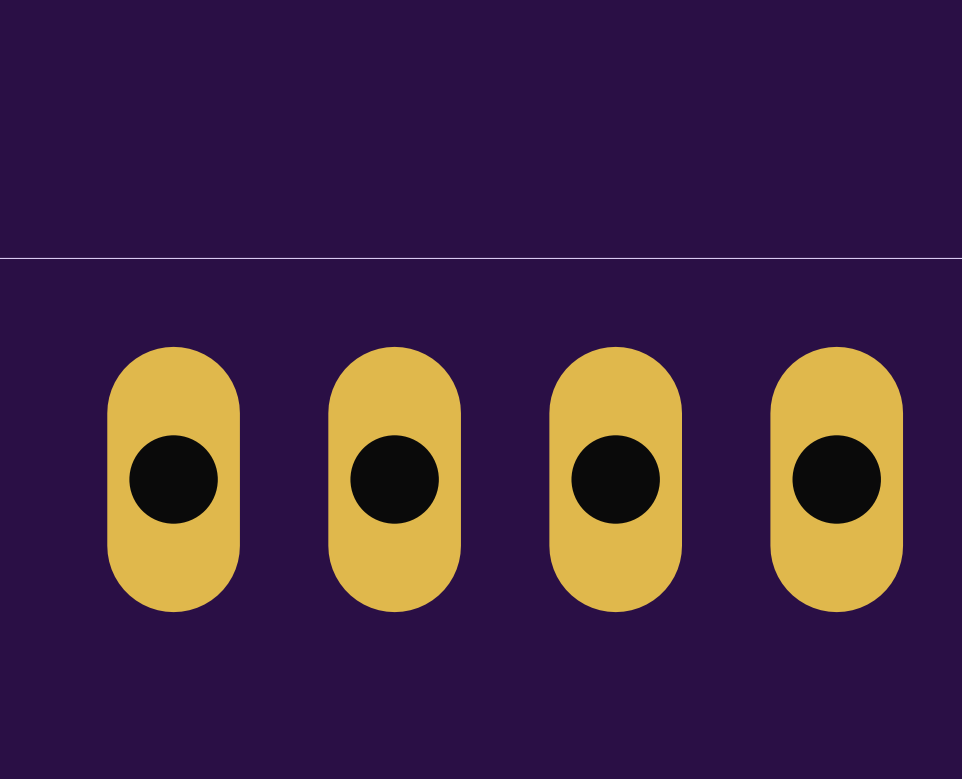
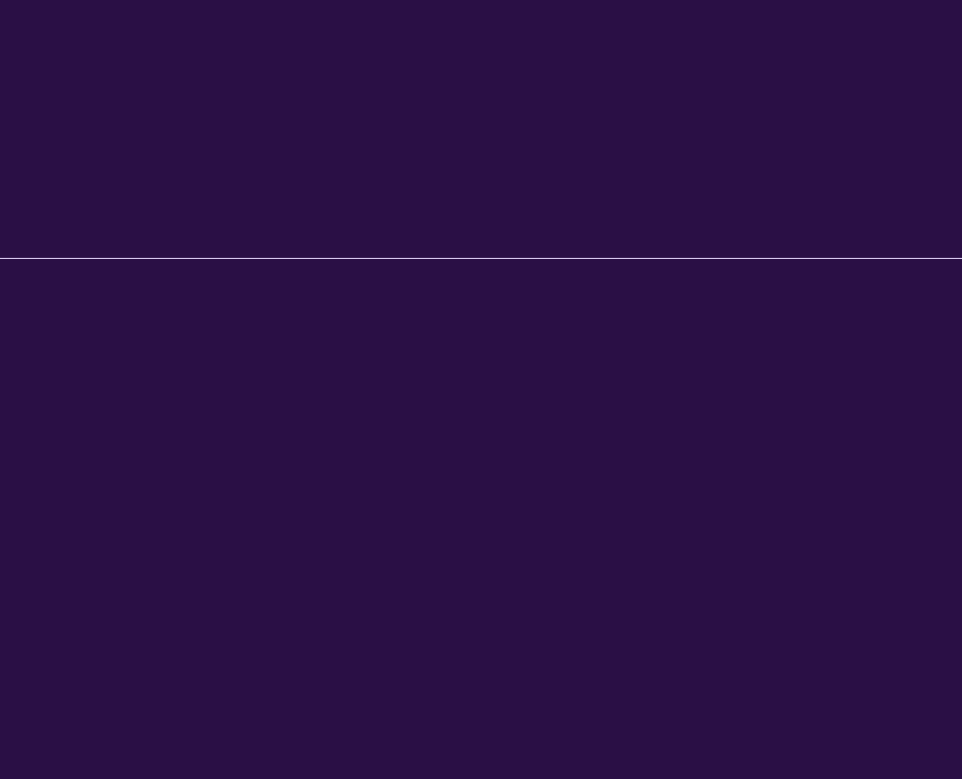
part: (505, 479) -> none

